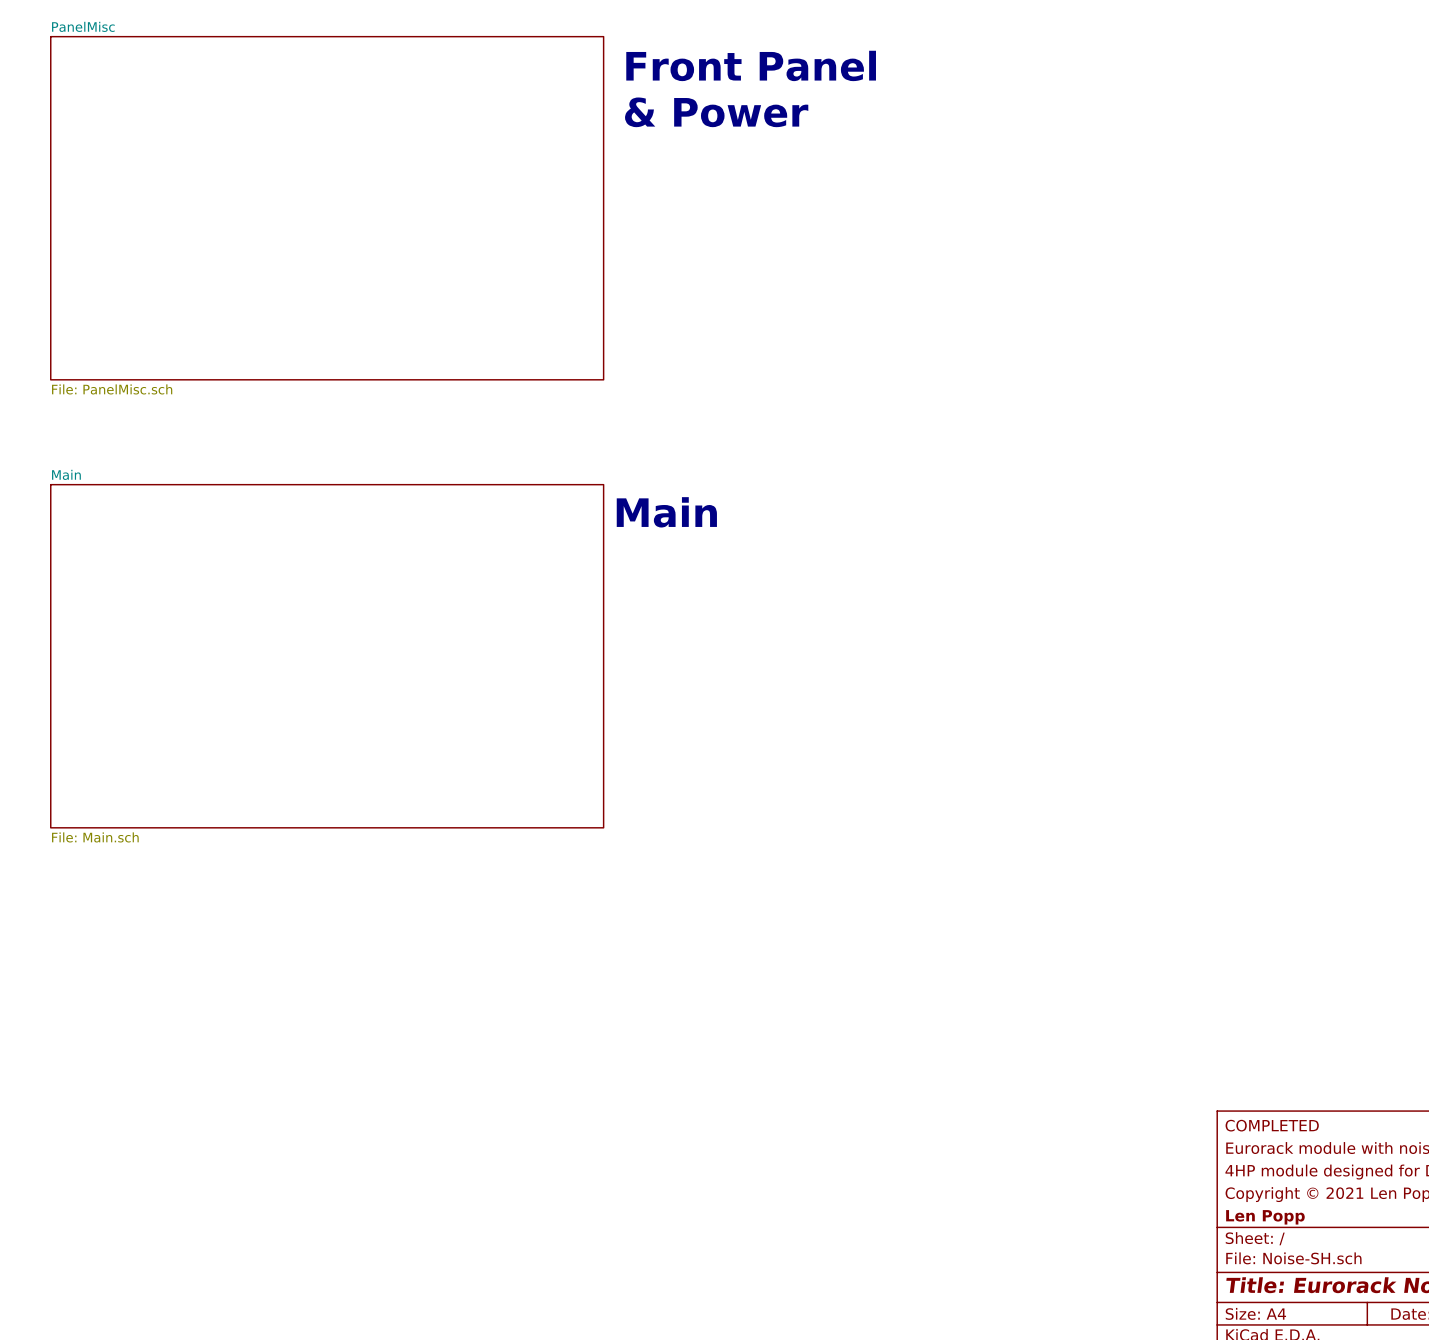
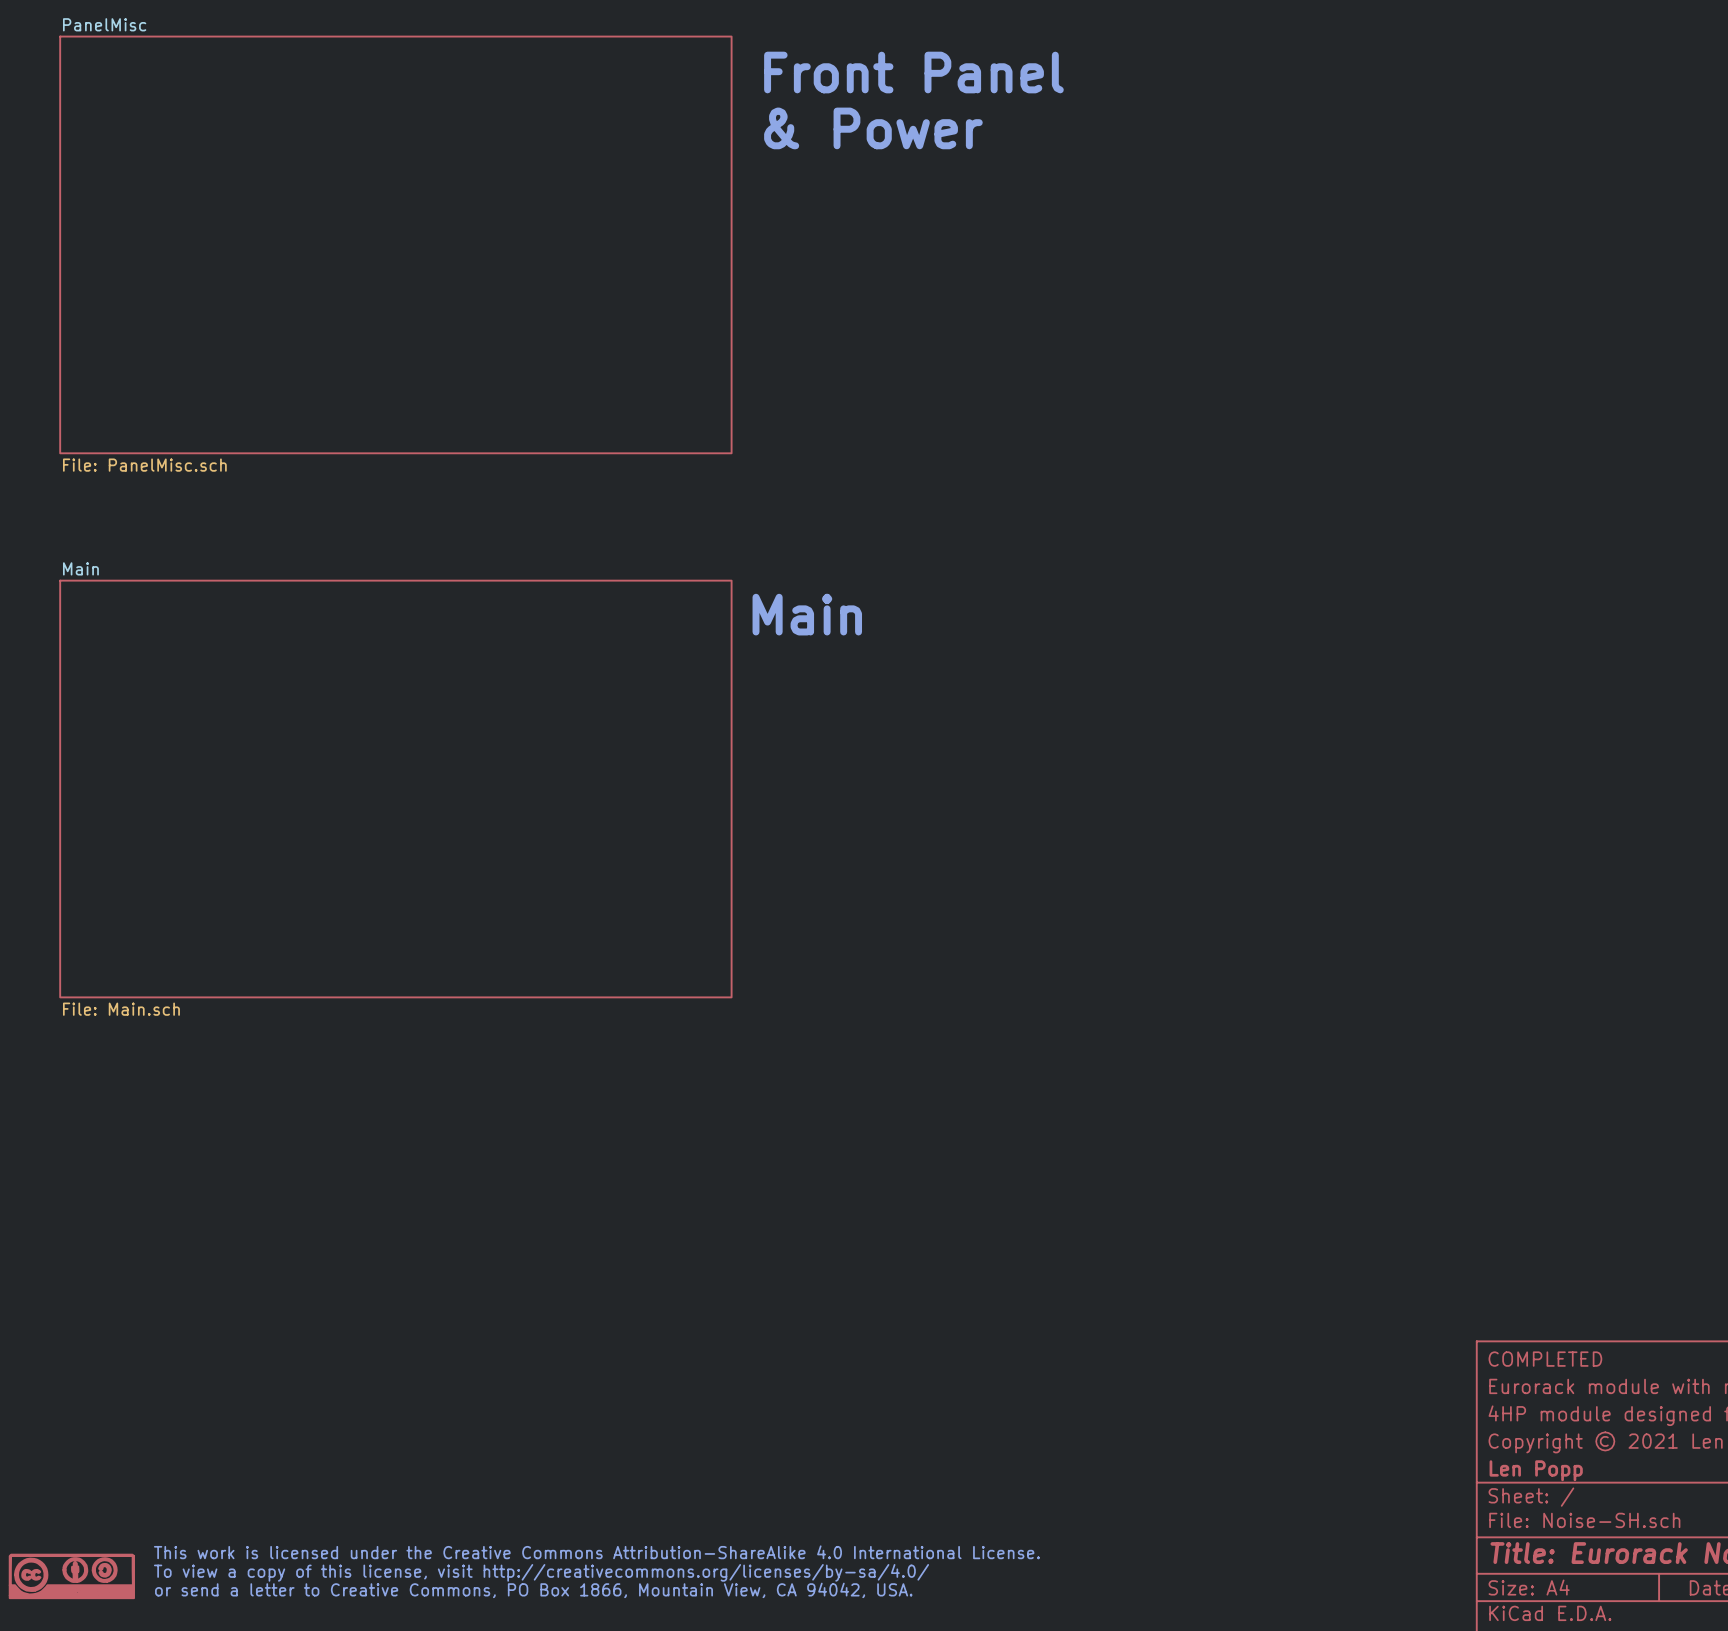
text: none -> This work is licensed under the Creative Commons Attribution-ShareAlike 4.0 International License. (596, 1552)
text: none -> To view a copy of this license, visit http://creativecommons.org/licenses/by-sa/4.0/ (541, 1572)
power symbol: none -> (71, 1576)
text: none -> or send a letter to Creative Commons, PO Box 1866, Mountain View, CA 94042, USA. (533, 1590)

